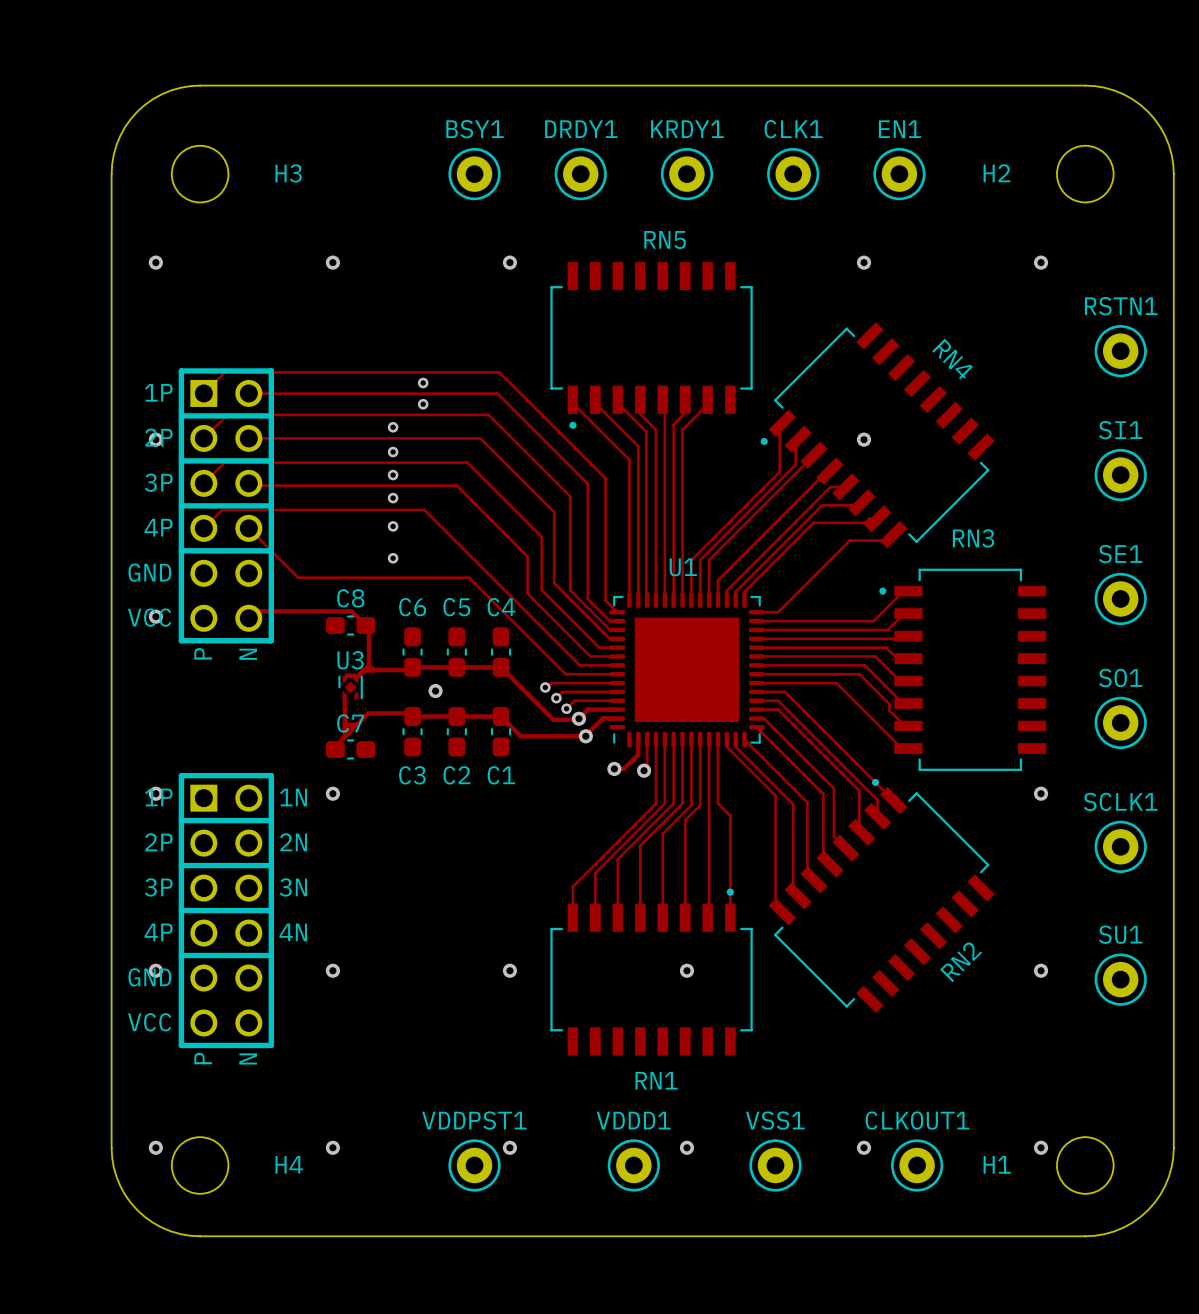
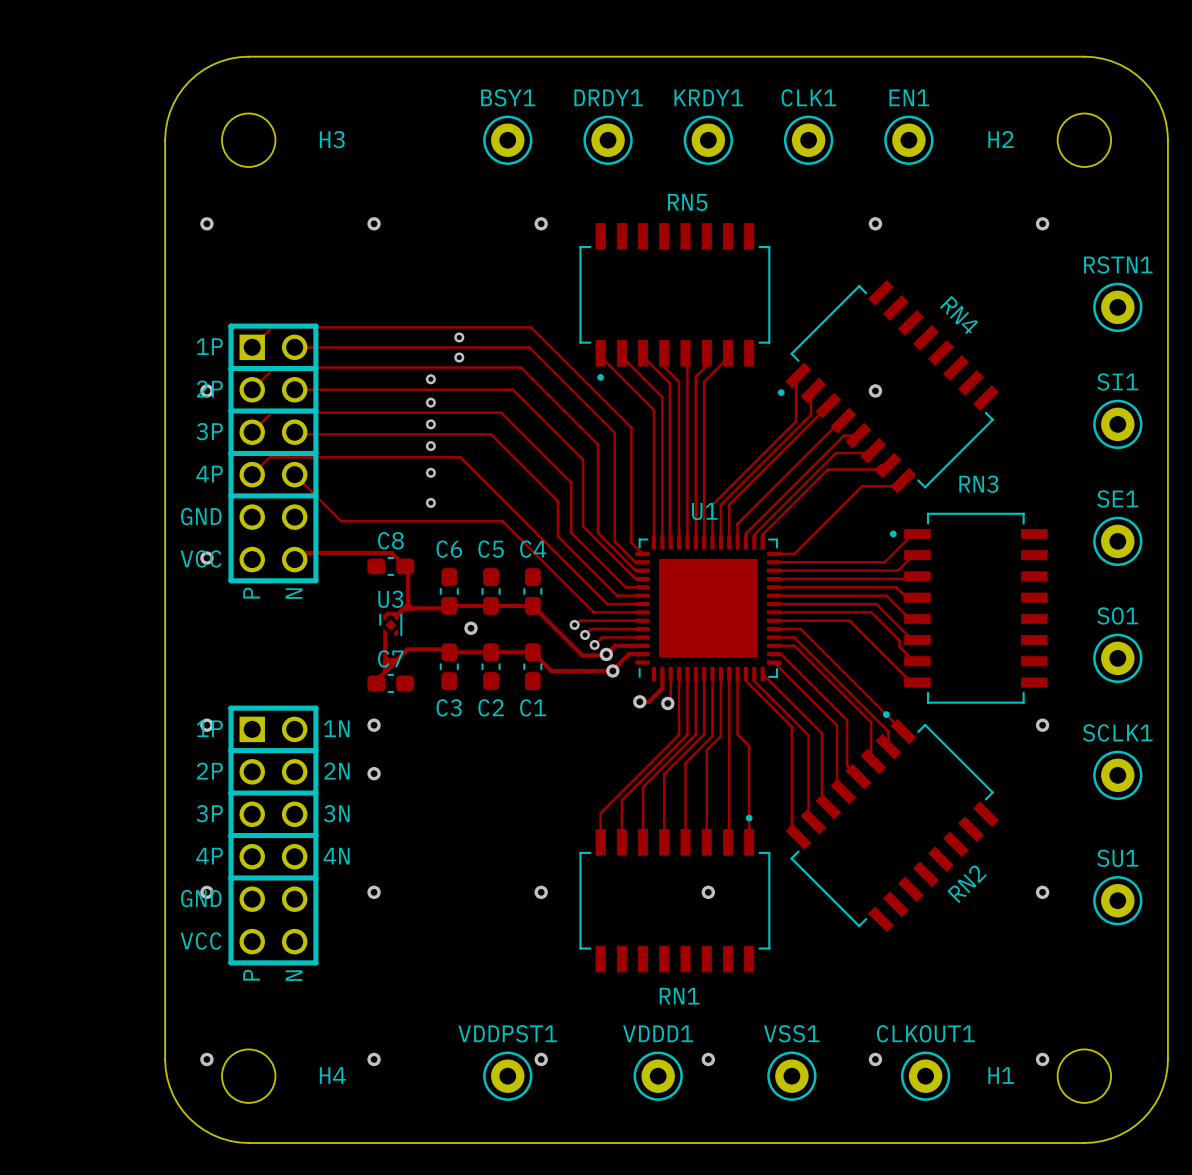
via: none -> (374, 773)

